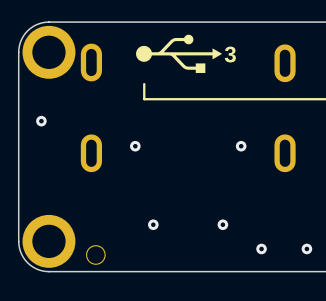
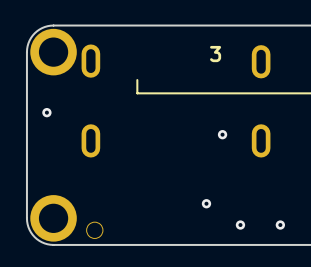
drawing: [136, 34, 222, 73] -> none
via: (135, 146) -> none
via: (153, 224) -> none

